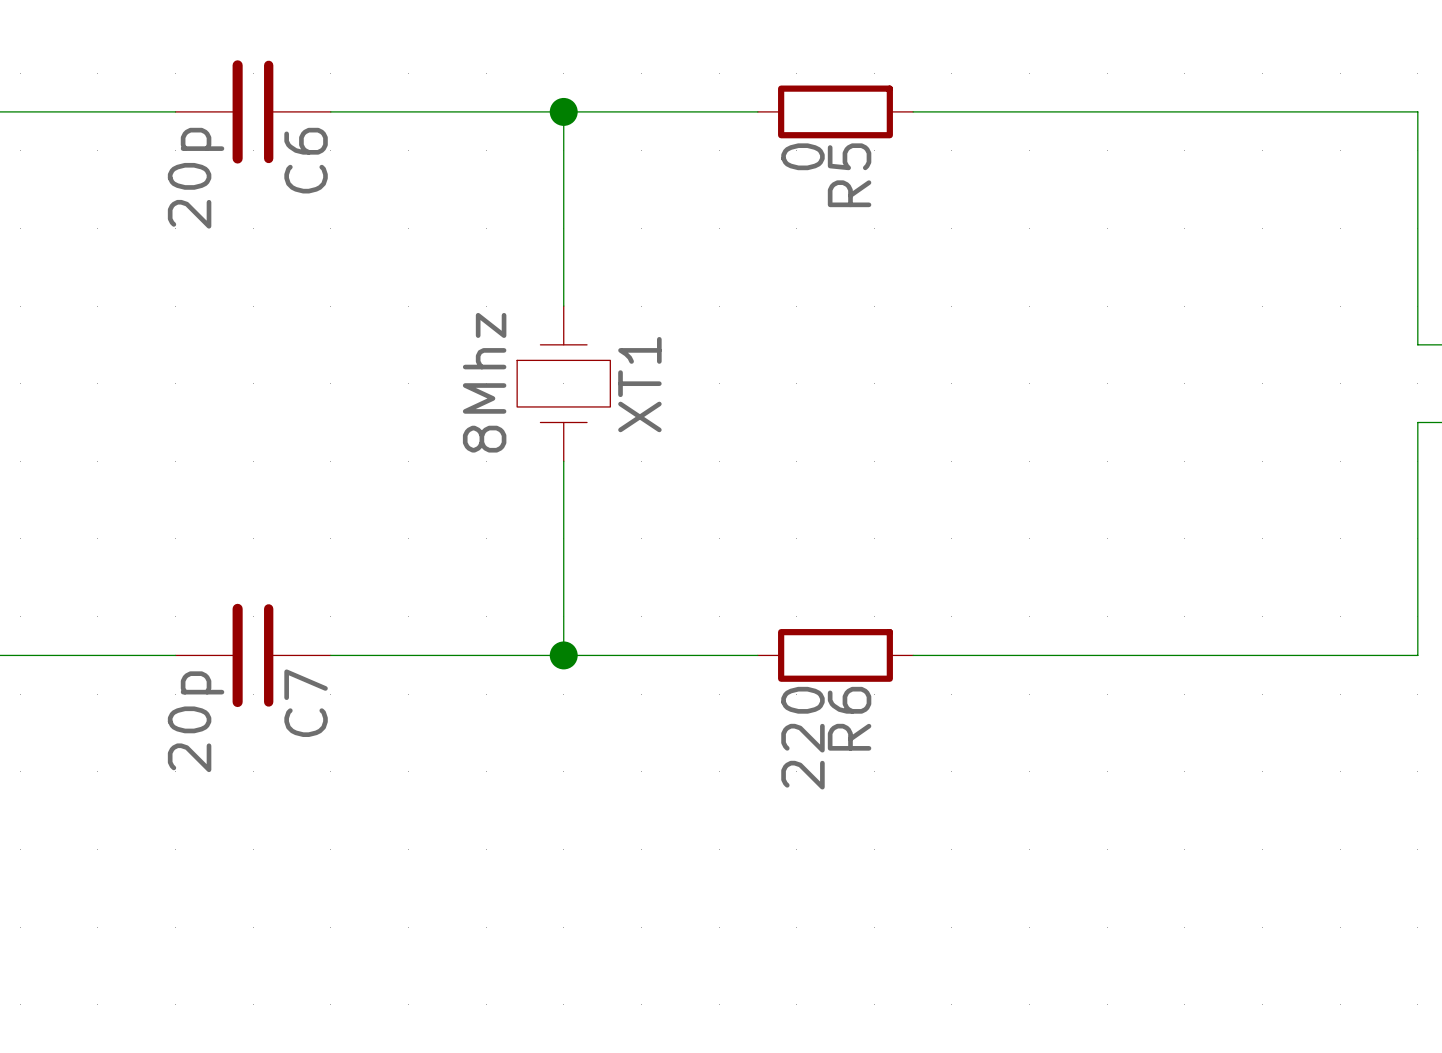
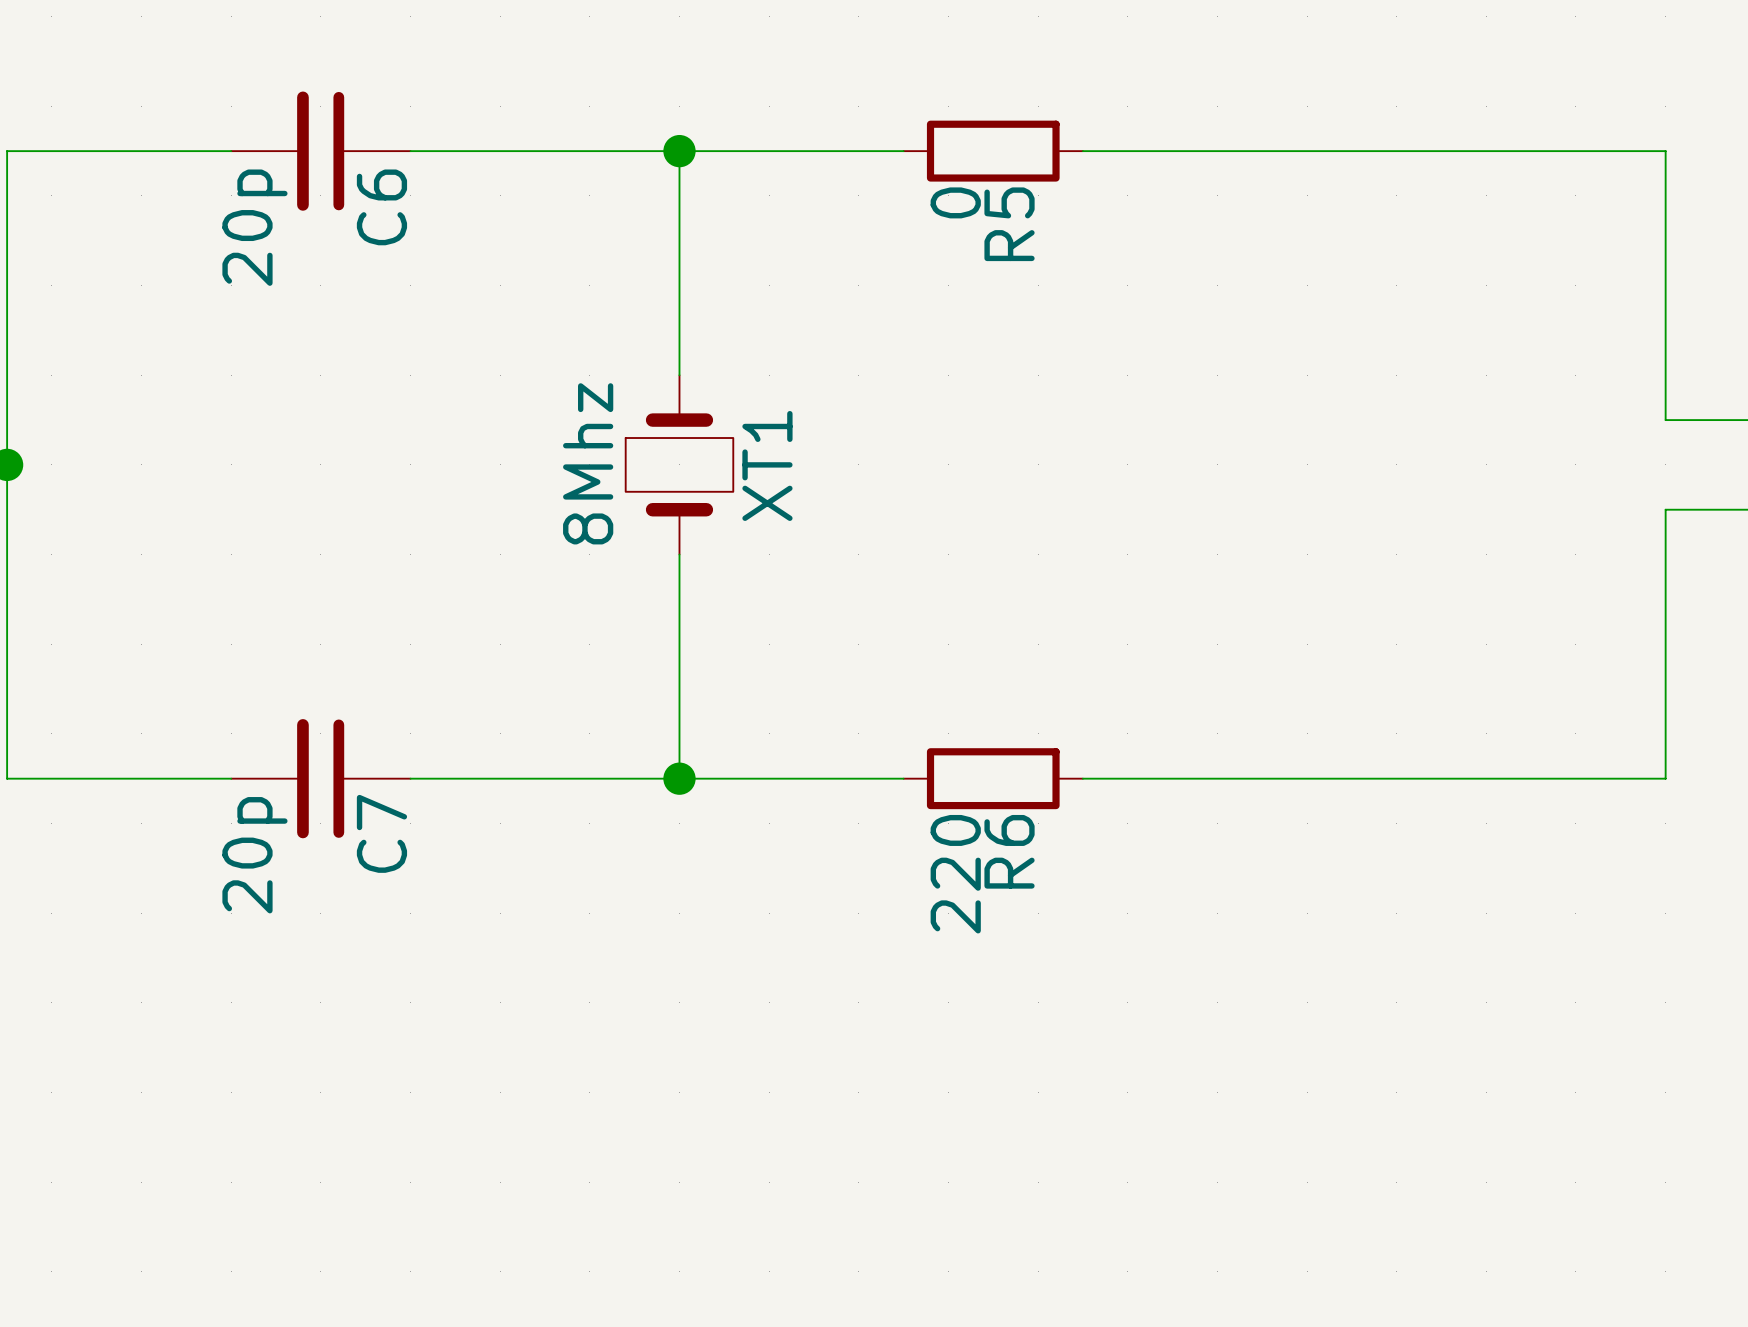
XT1 symbol: [517, 306, 611, 462] -> [625, 375, 734, 555]

